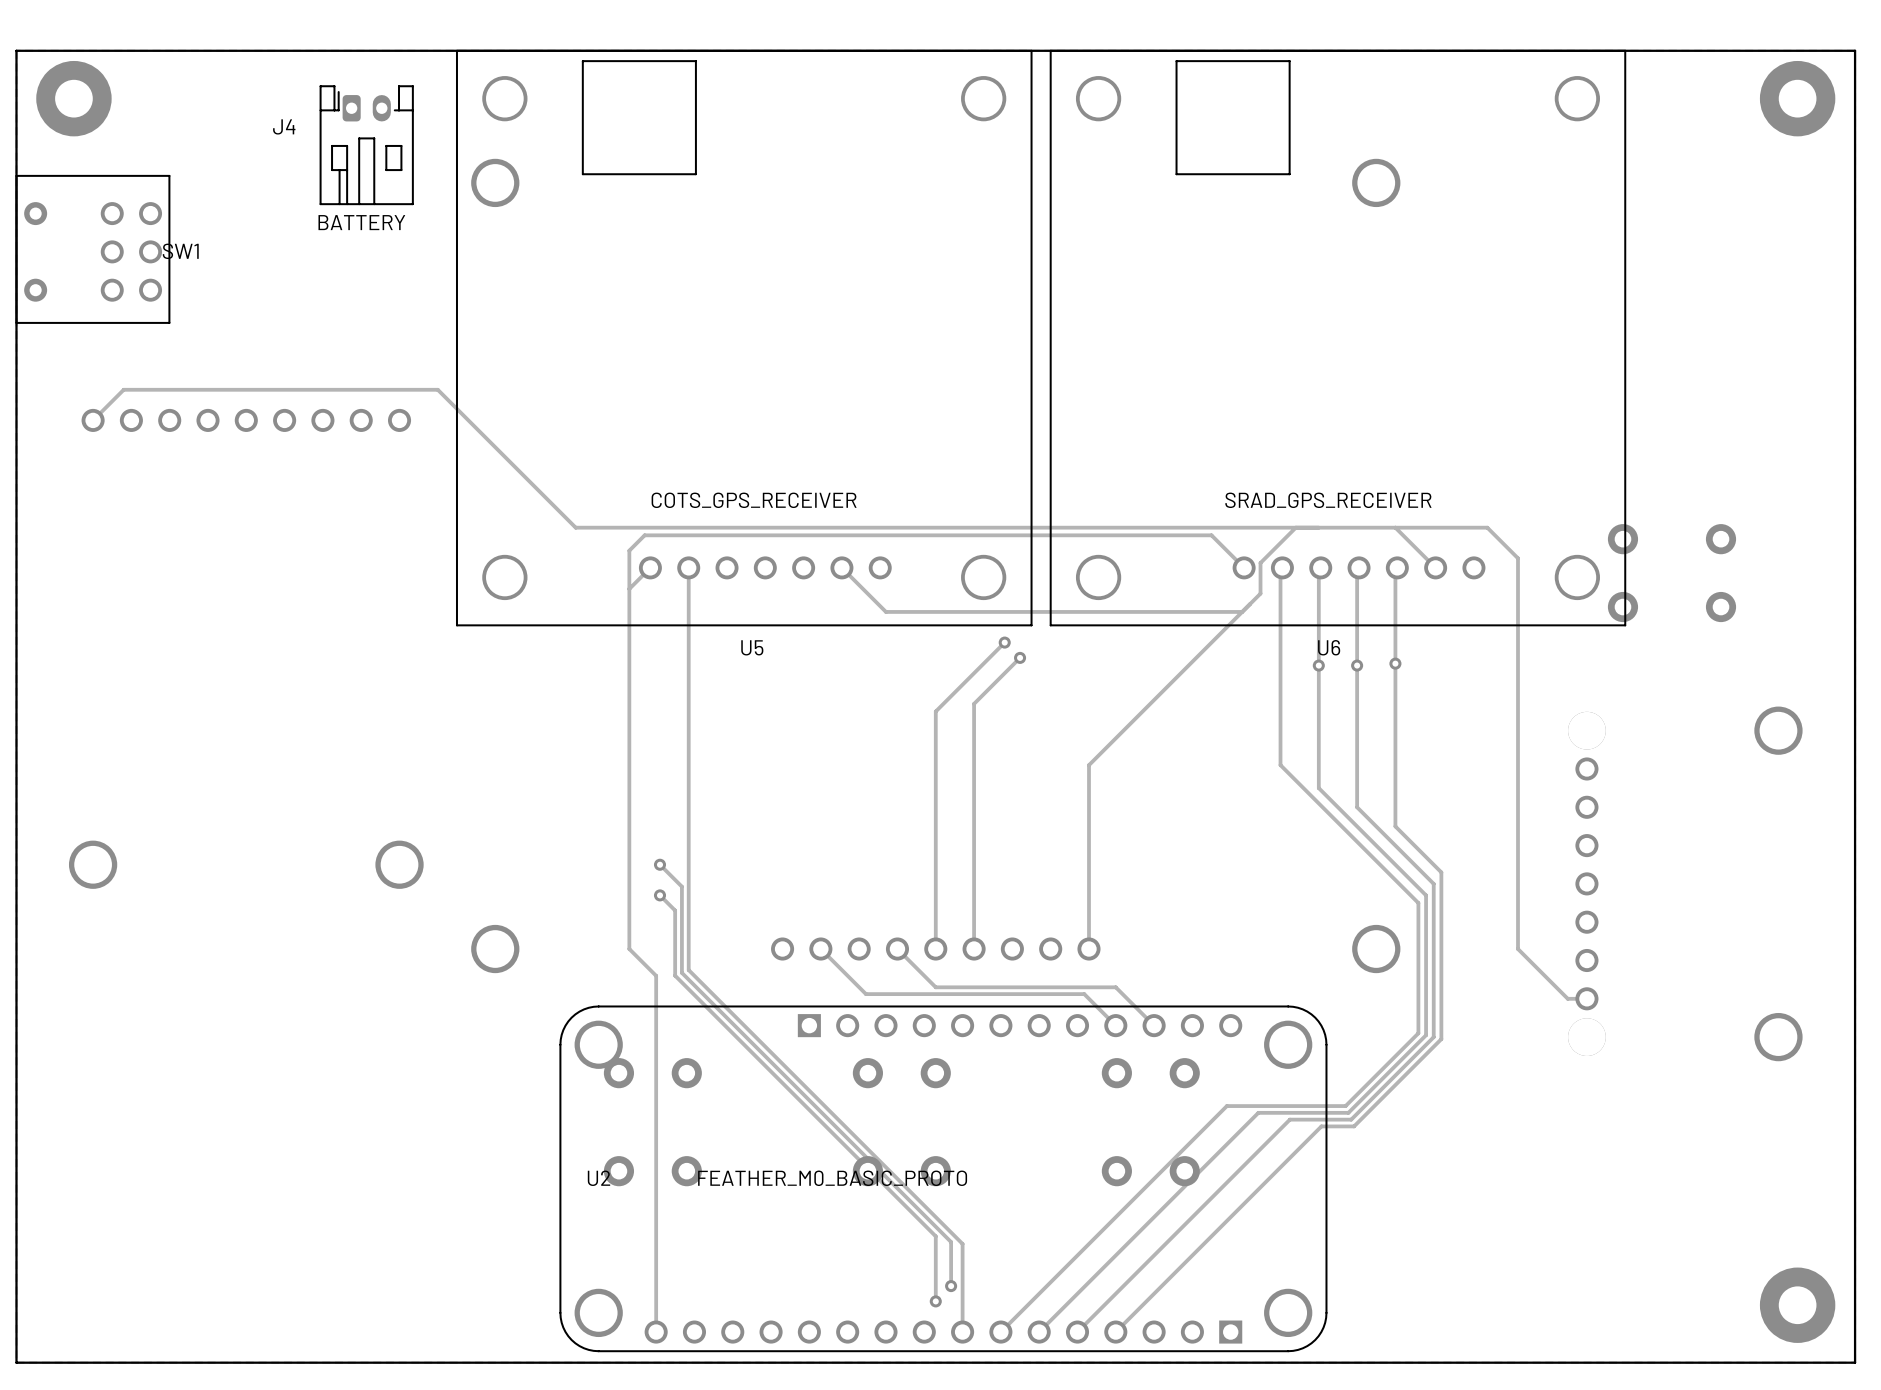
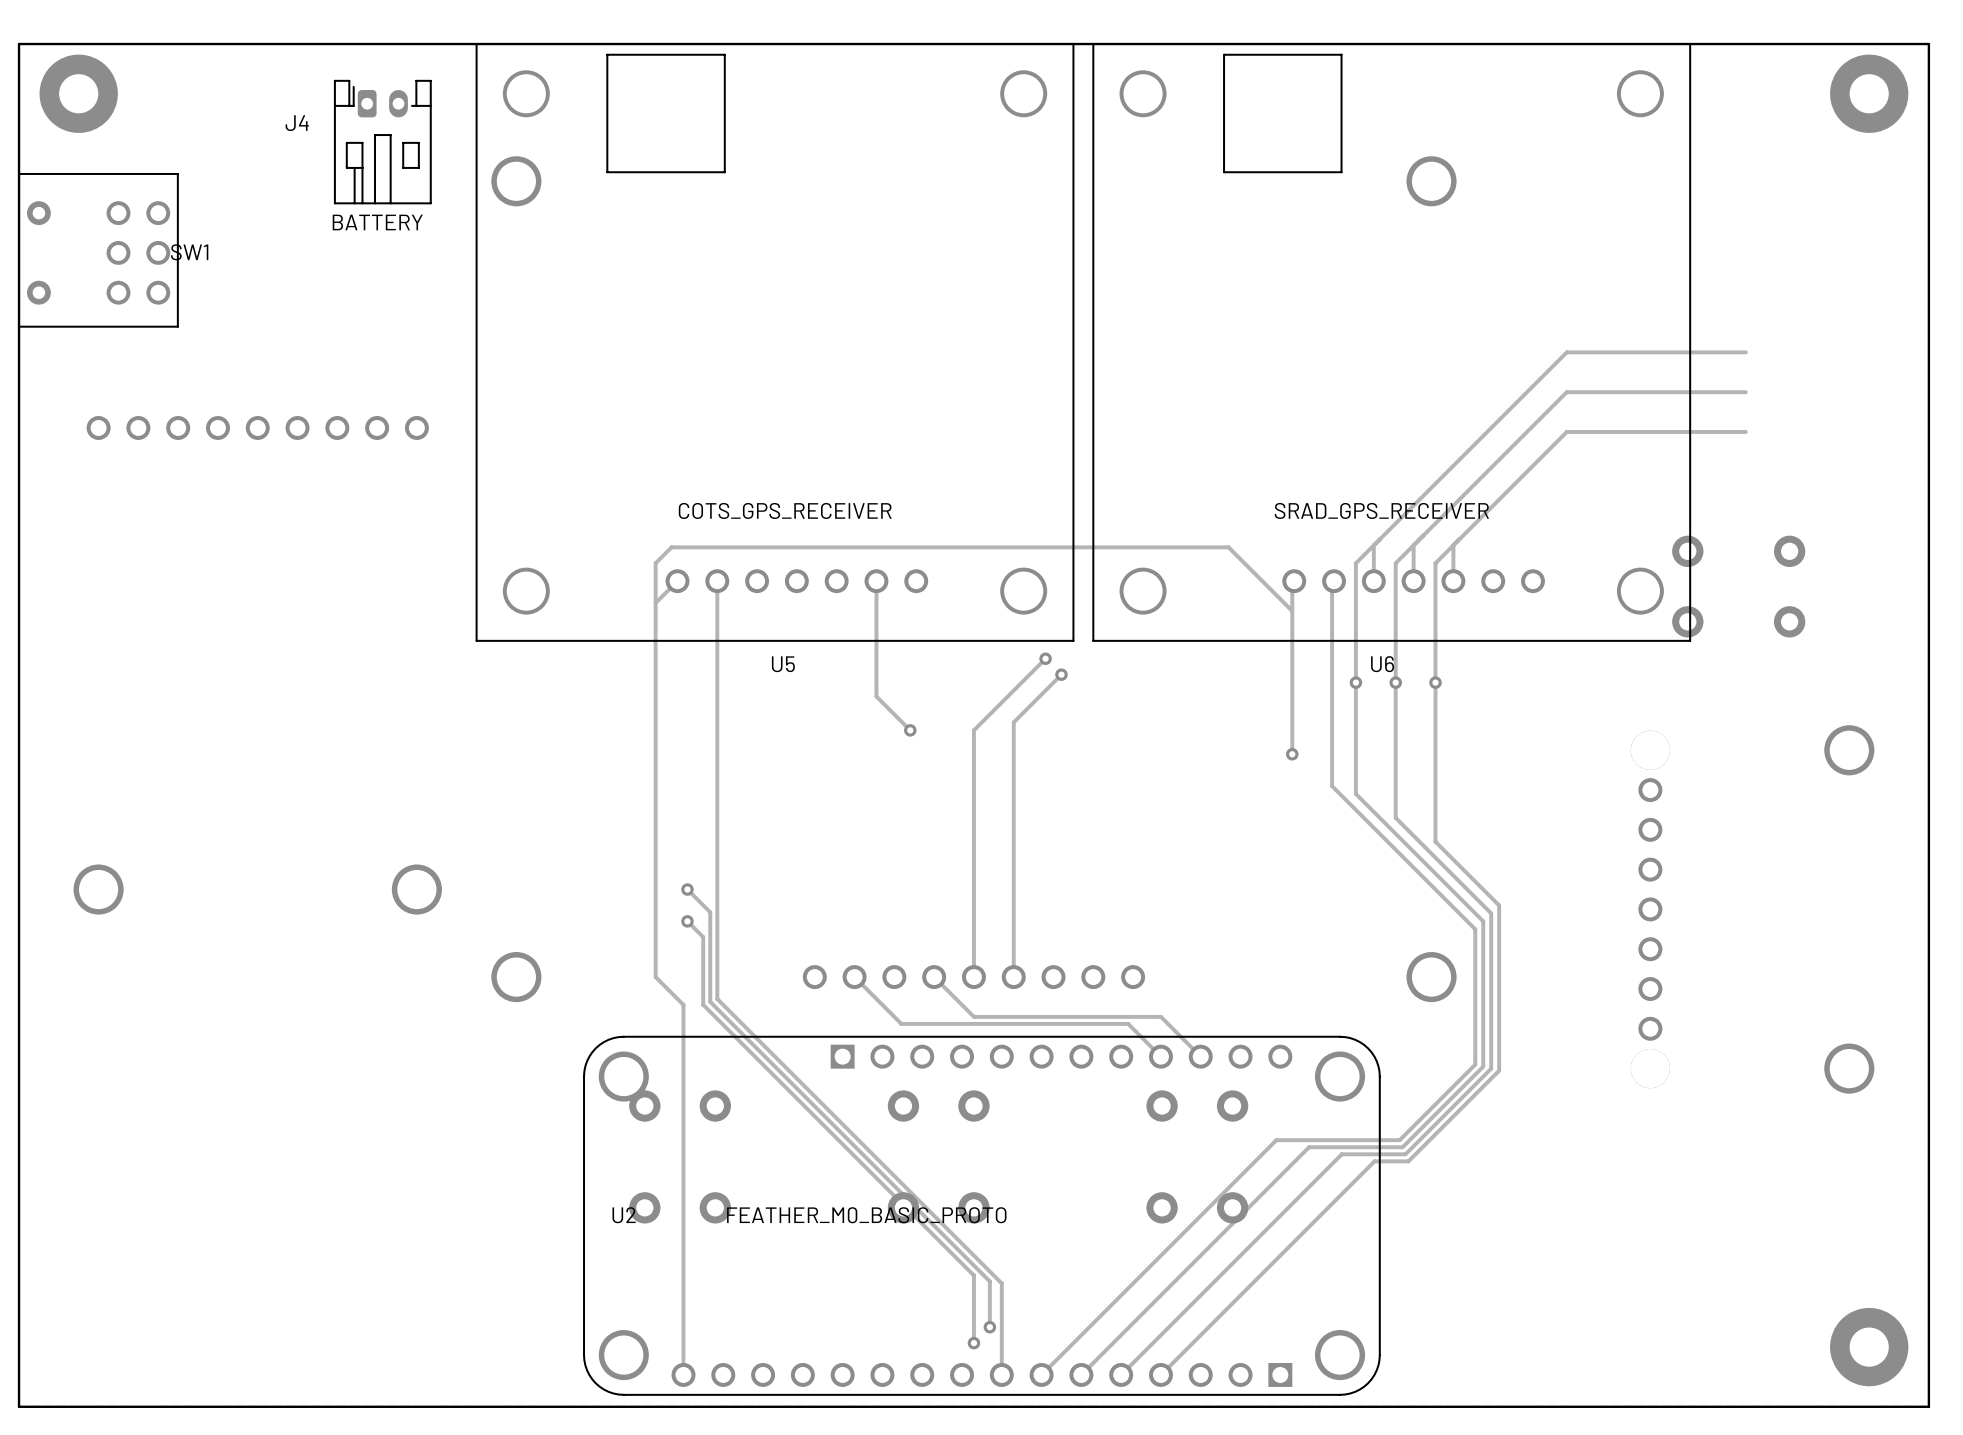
track: none -> (1745, 352) (1566, 352) (1355, 563) (1355, 794) (1371, 809)
track: none -> (1745, 392) (1566, 392) (1395, 563) (1395, 817) (1491, 913)
track: (93, 420) (123, 389) (437, 389) (575, 527) (1487, 527) (1517, 558) (1517, 949) (1567, 998) (1586, 998) -> none
track: (1295, 527) (1260, 562) (1260, 593) (1088, 765) (1088, 949) -> none
track: (1395, 527) (1435, 567) -> none
track: none -> (1453, 545) (1453, 581)
track: (1180, 535) (1211, 535) (1244, 567) -> (1228, 547) (1292, 611)
track: (841, 567) (885, 611) (1242, 611) -> (876, 581) (876, 696) (910, 730)
track: (1320, 567) (1318, 569) (1318, 788) -> (1373, 581) (1373, 545)
track: (1359, 567) (1357, 569) (1357, 807) (1433, 883) (1433, 887) -> (1413, 581) (1413, 545)
track: (1397, 567) (1395, 569) (1395, 826) (1441, 872) (1441, 880) -> (1745, 431) (1566, 431) (1435, 563) (1435, 841) (1499, 905)
track: none -> (1292, 583) (1292, 754)
via: (1395, 663) -> none
via: none -> (1355, 682)
via: (1318, 665) -> none
via: none -> (1395, 682)
via: (1357, 665) -> none
via: none -> (1435, 682)
via: none -> (910, 730)
via: none -> (1292, 754)

